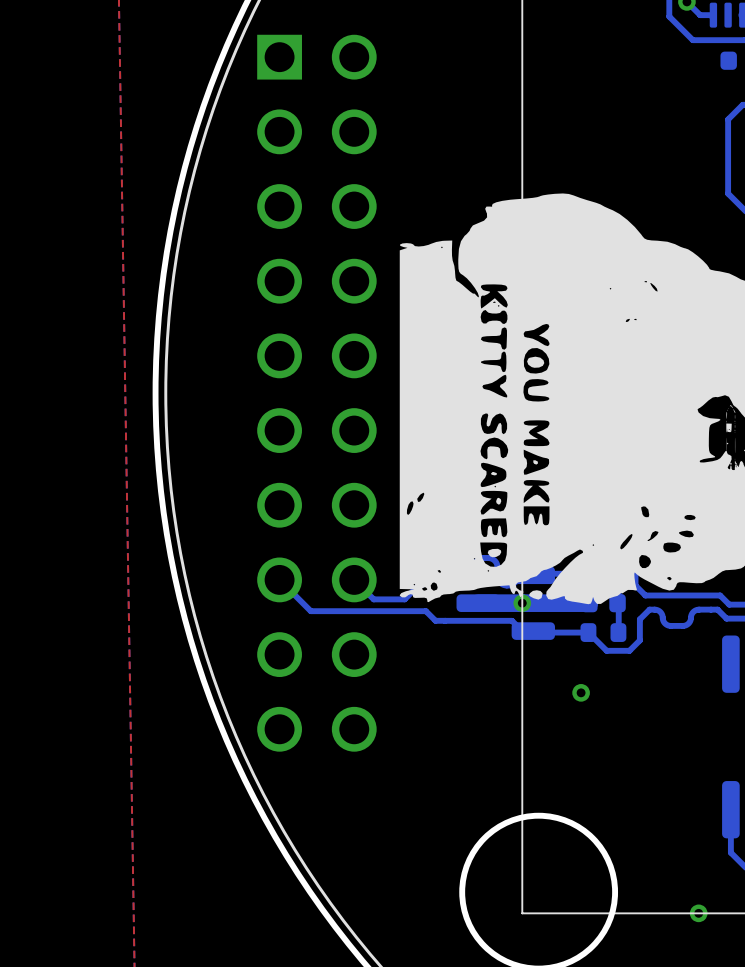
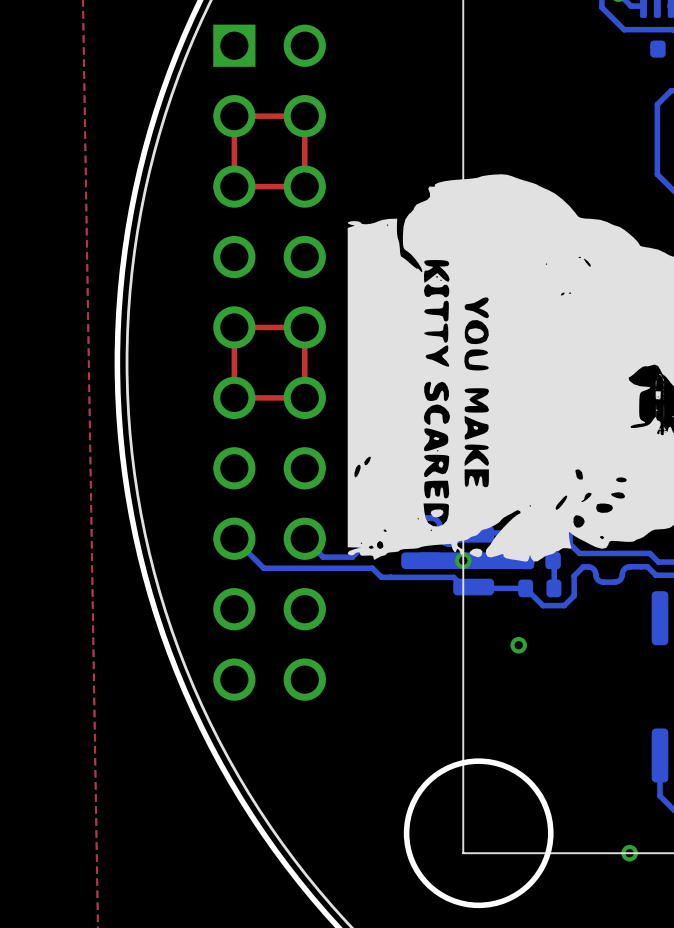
top track: none -> (234, 116) (234, 186) (304, 186) (304, 116) (234, 116)
top track: none -> (234, 327) (234, 397) (304, 397) (304, 327) (234, 327)

